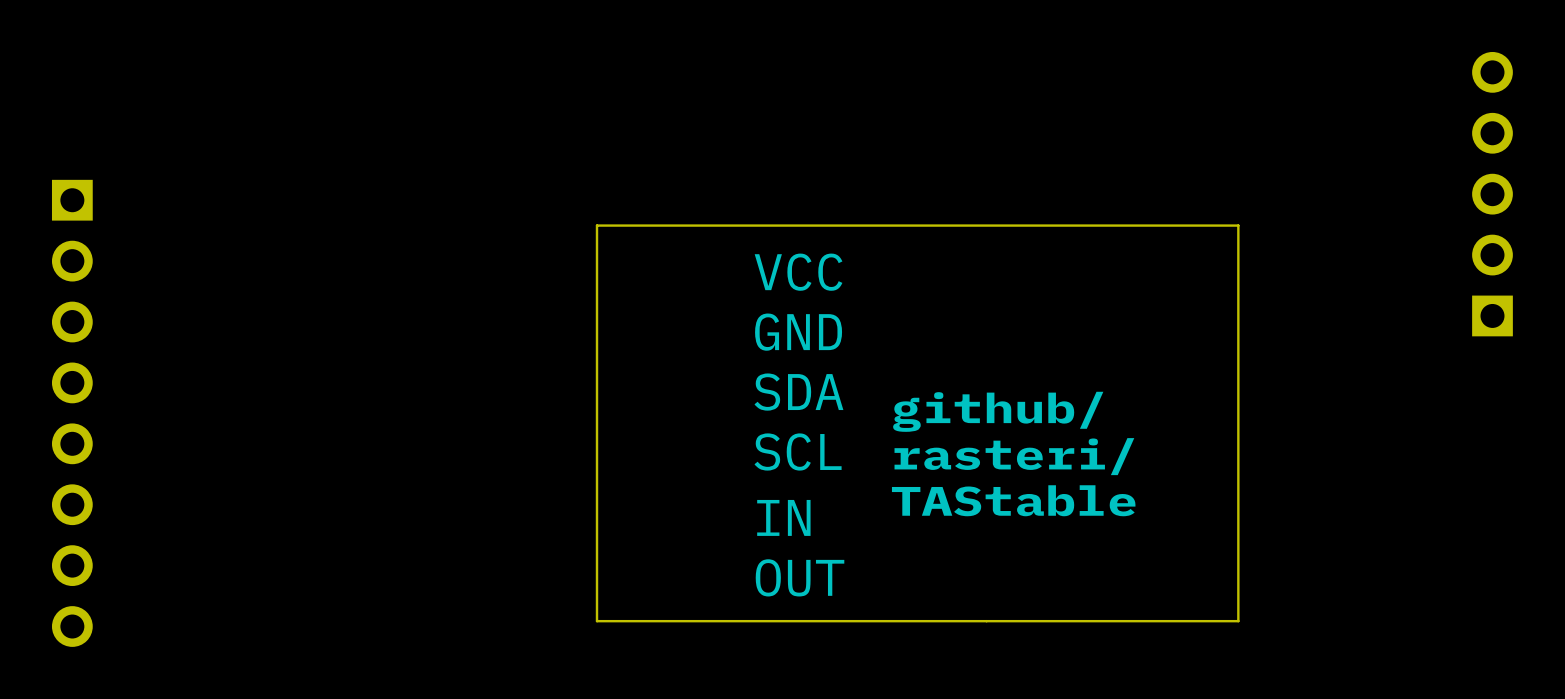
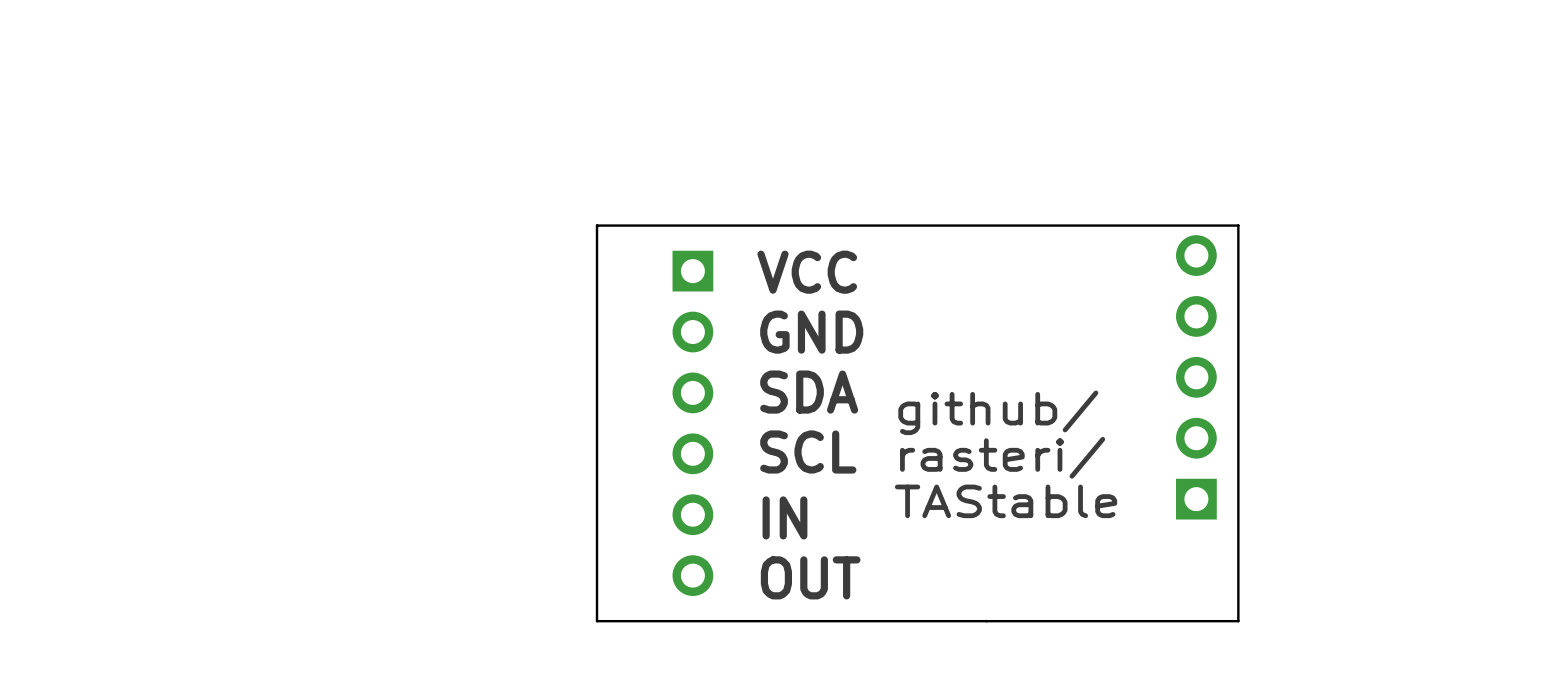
part position: (1492, 194) -> (1196, 377)
part: (72, 413) -> none
part: none -> (692, 423)

